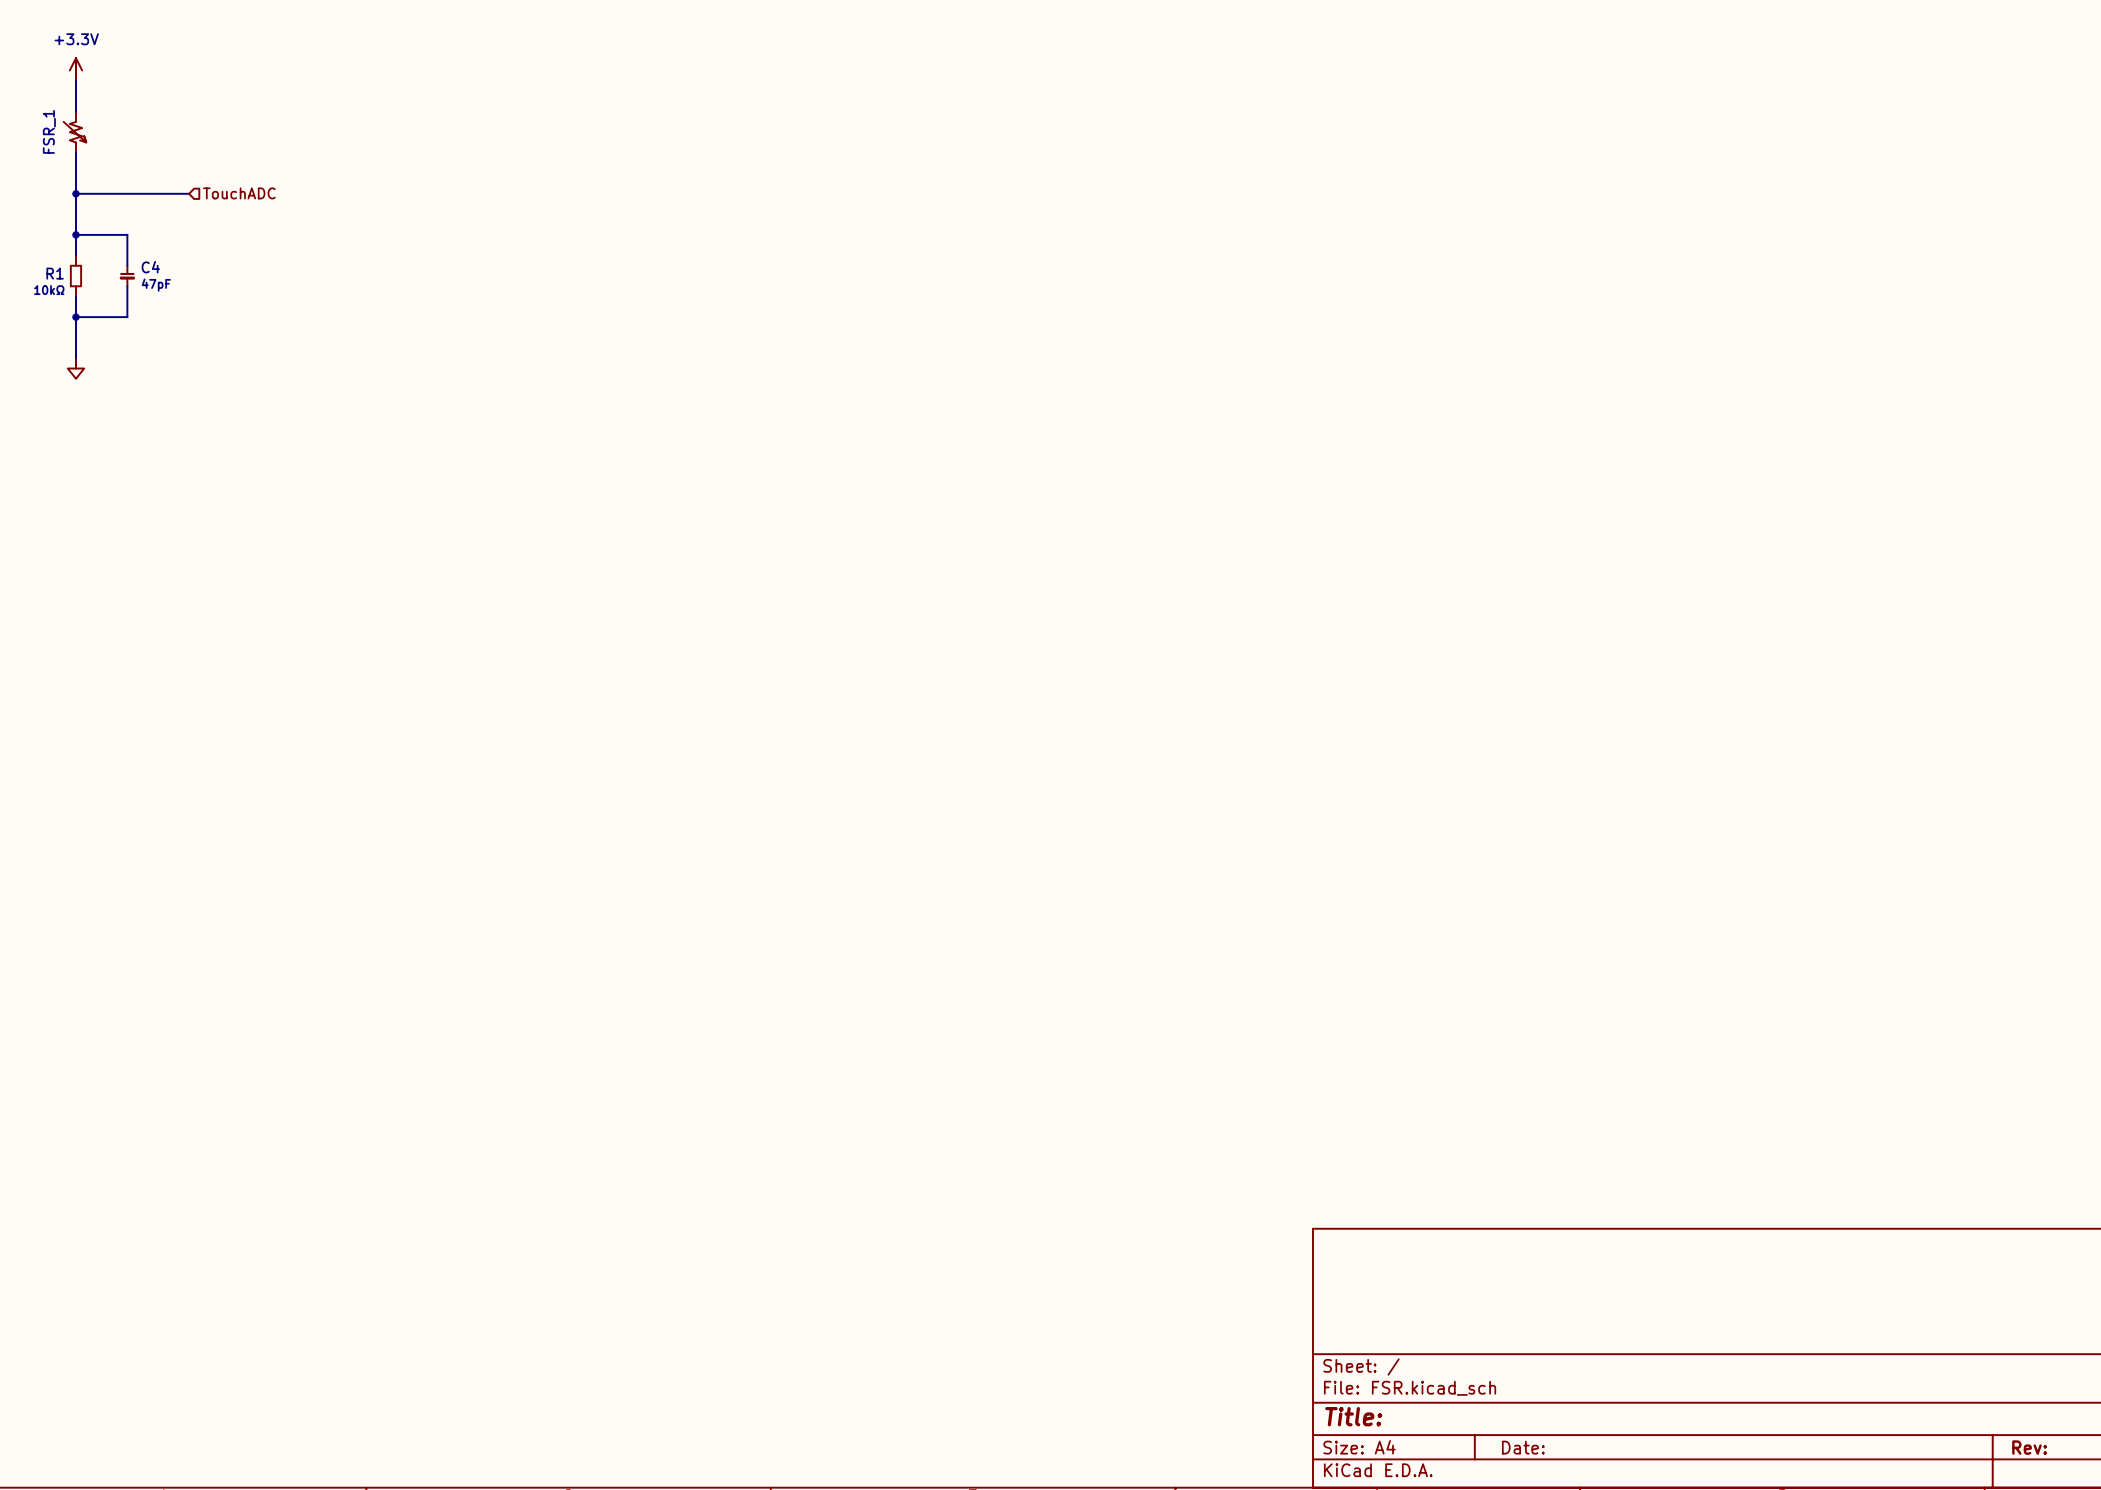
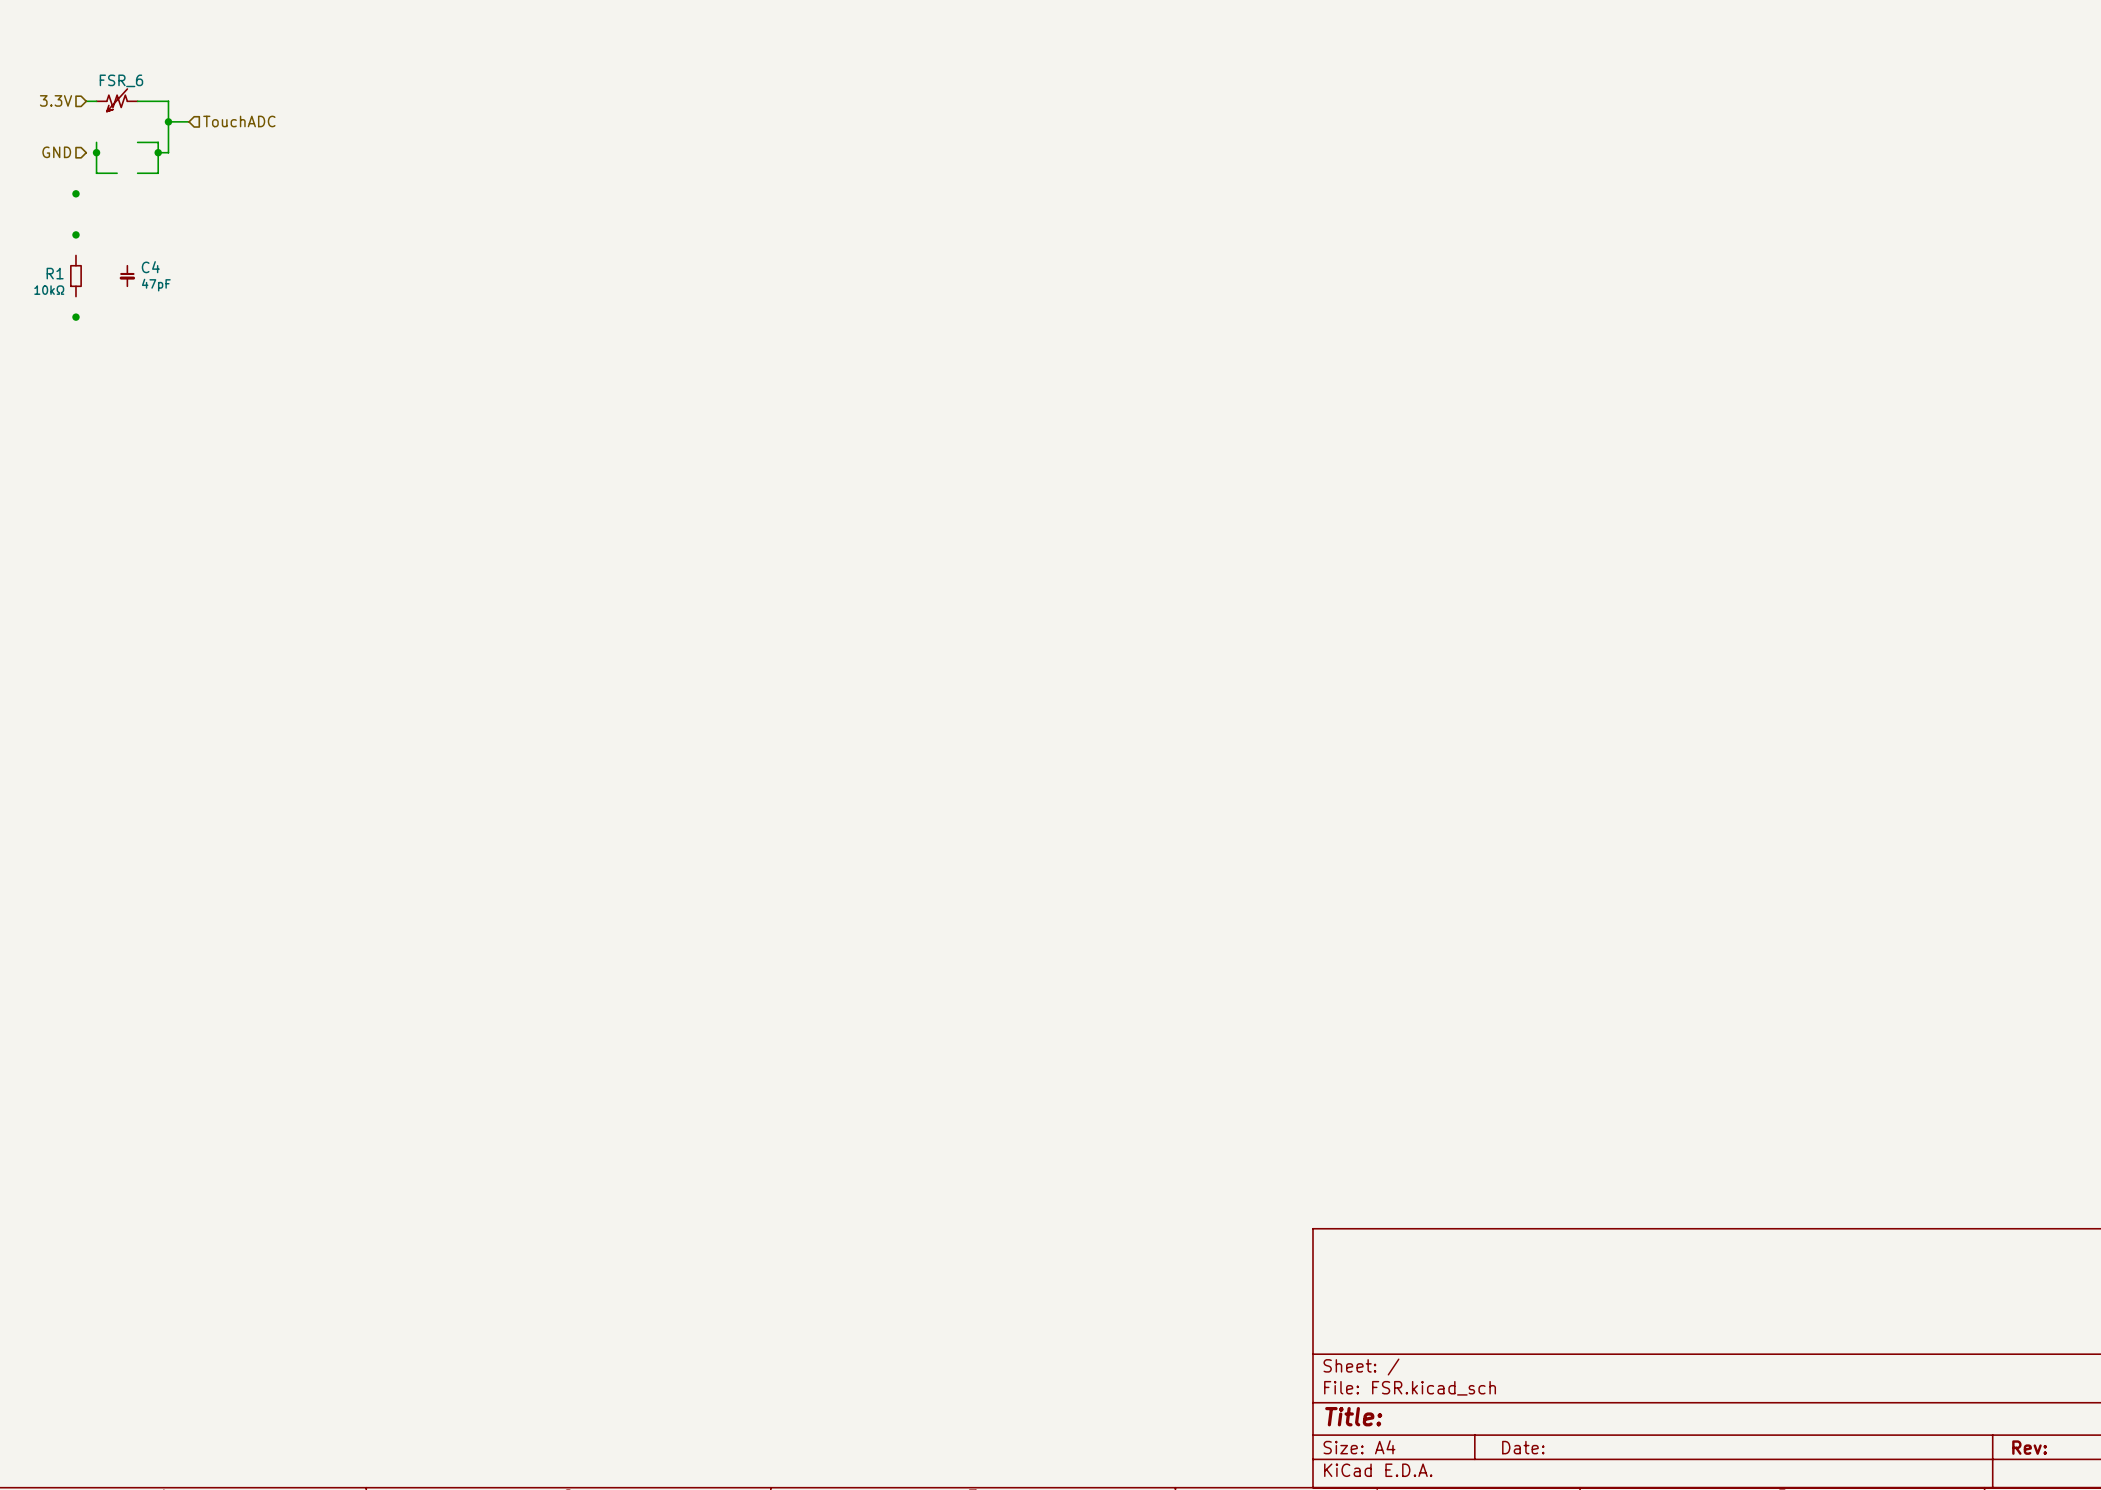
power symbol: +3.3V (75, 69) -> none
wire: (75, 80) (75, 111) -> none
hierarchical label: none -> 3.3V (56, 100)
FSR_6: none -> (117, 100)
wire: none -> (86, 101) (96, 101)
wire: none -> (137, 101) (168, 101) (168, 152) (158, 152)
wire: none -> (168, 121) (189, 121)
junction: none -> (168, 121)
FSR_1: (74, 132) -> none
wire: none -> (96, 142) (96, 173) (117, 173)
wire: none -> (137, 142) (158, 142) (158, 173) (137, 173)
hierarchical label: none -> GND (56, 152)
wire: (75, 152) (75, 255) -> none
junction: none -> (96, 152)
junction: none -> (158, 152)
wire: (75, 193) (189, 193) -> none
hierarchical label position: TouchADC (239, 193) -> TouchADC (239, 121)
wire: (75, 234) (127, 234) (127, 265) -> none
wire: (127, 286) (127, 317) (75, 317) -> none
wire: (75, 296) (75, 358) -> none
power symbol: (75, 368) -> none

